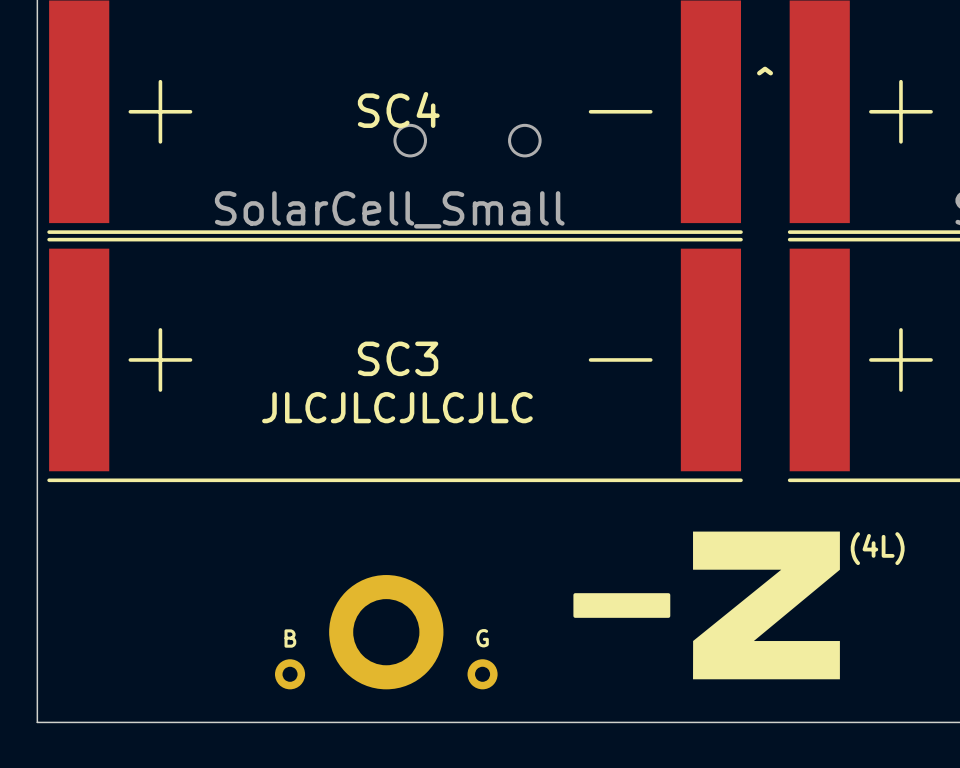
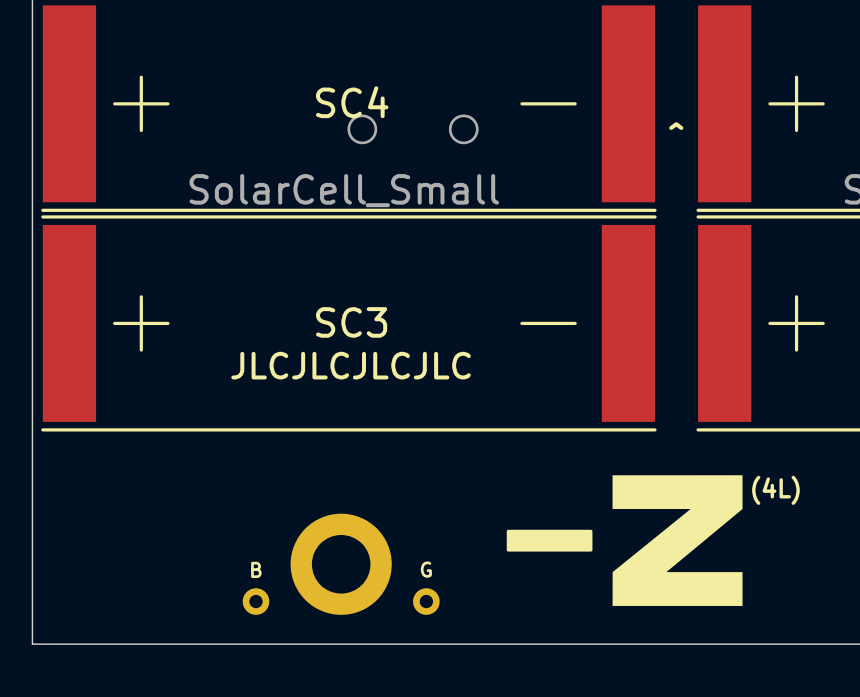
text position: ^ (765, 71) -> ^ (676, 126)

